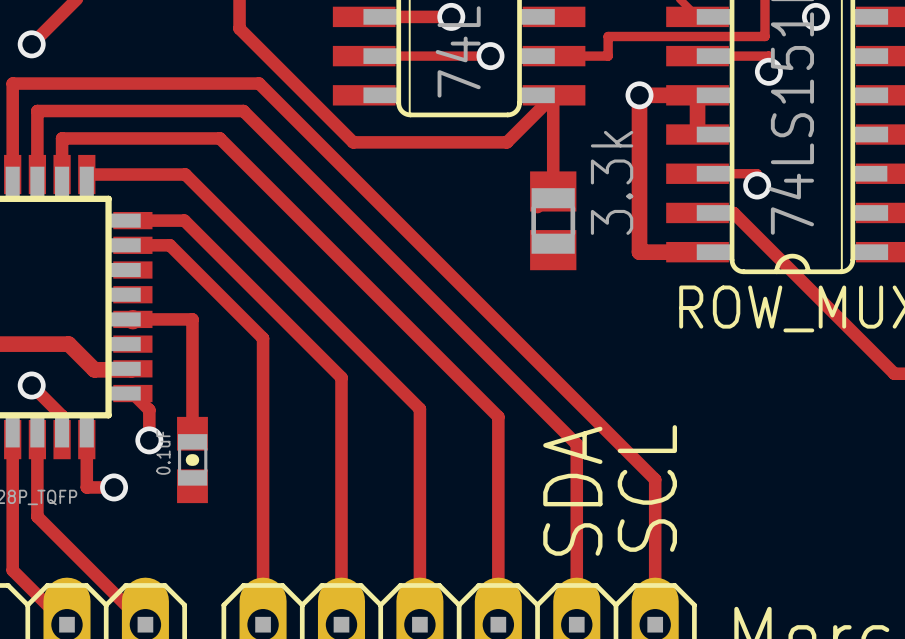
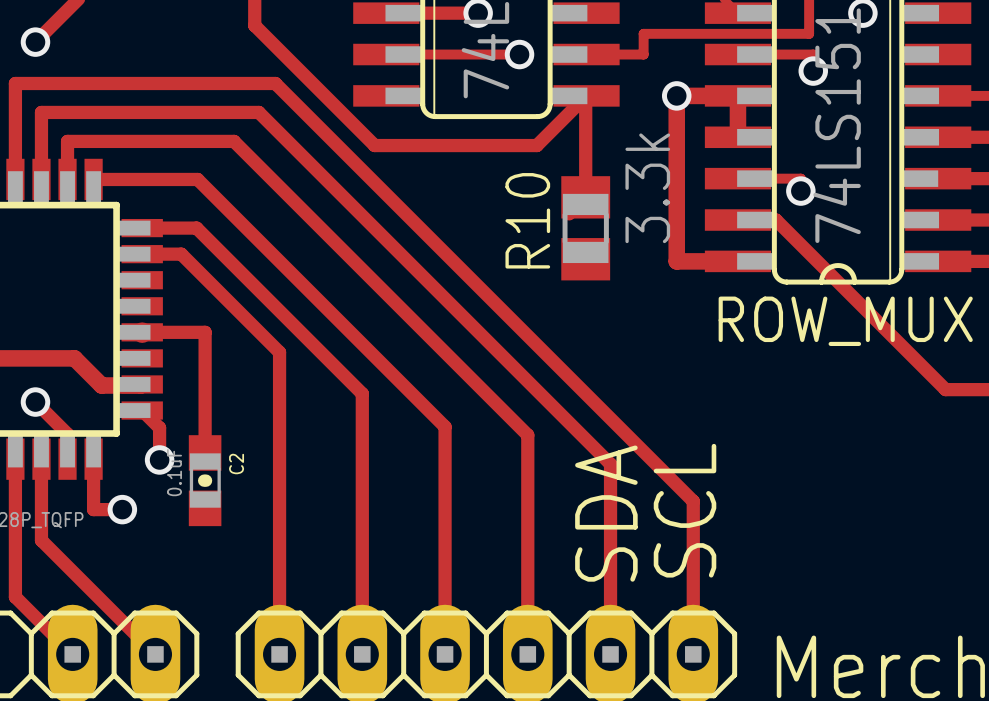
R10 name: none -> R10 (527, 220)
C2 name: none -> C2 (236, 464)

